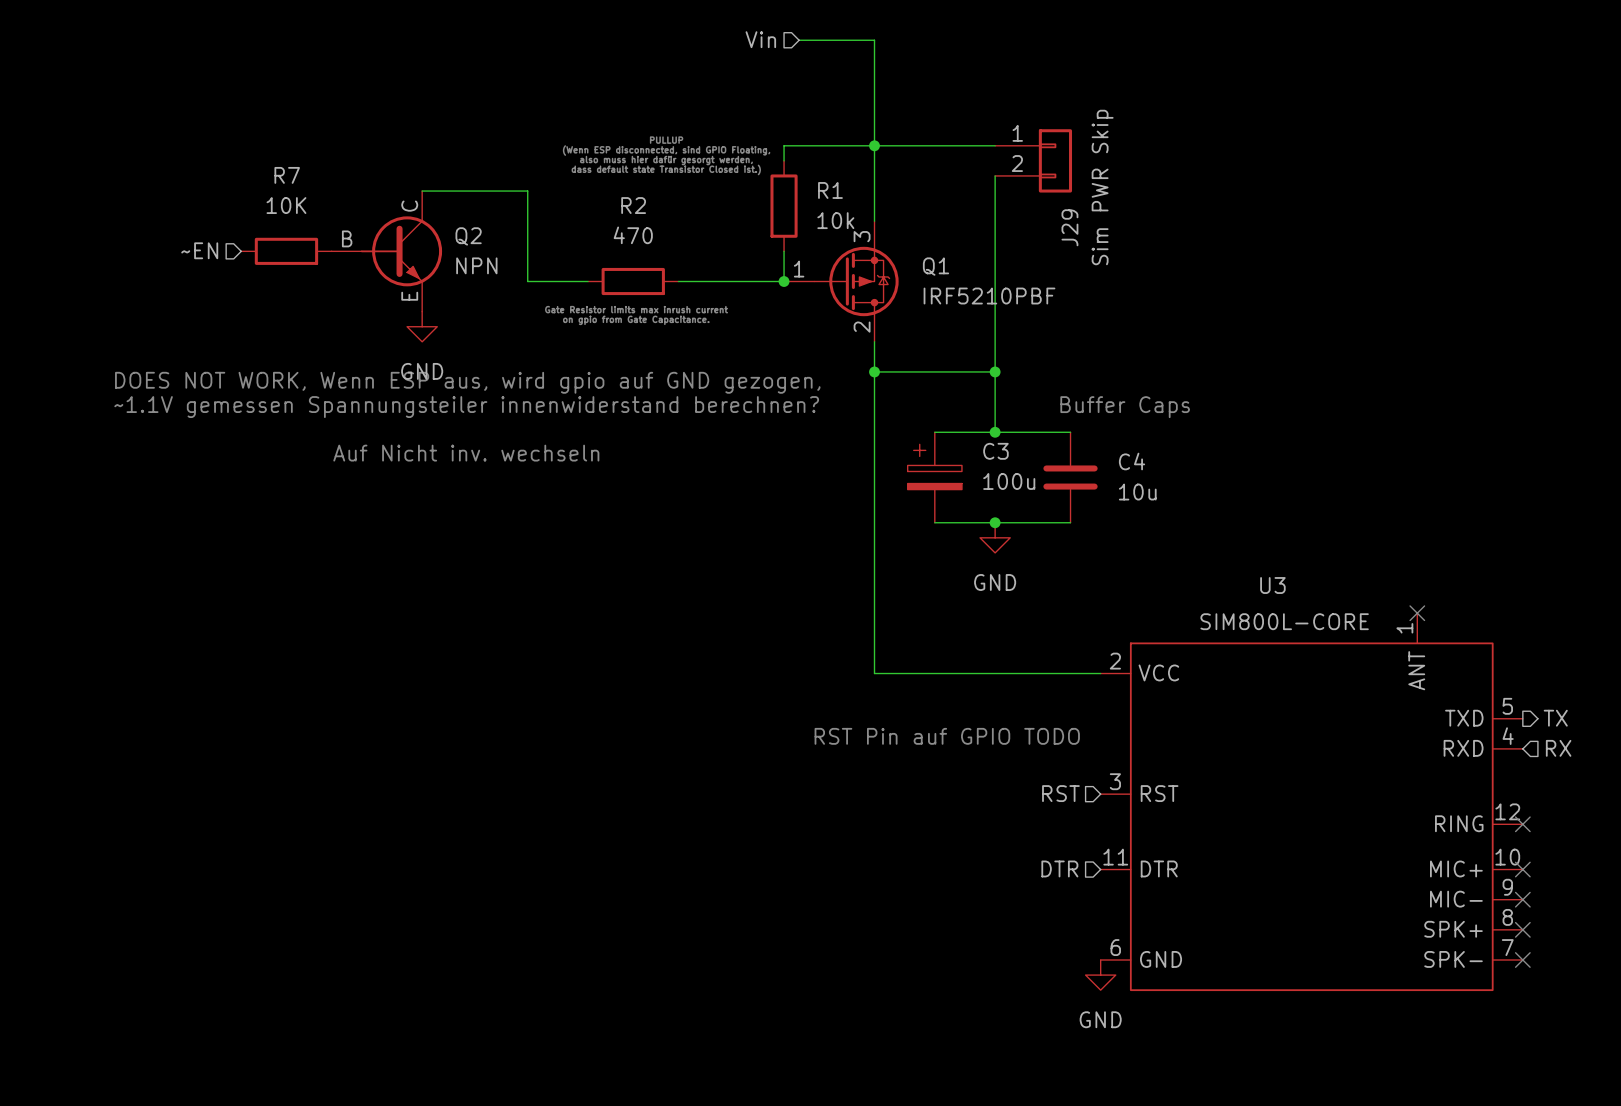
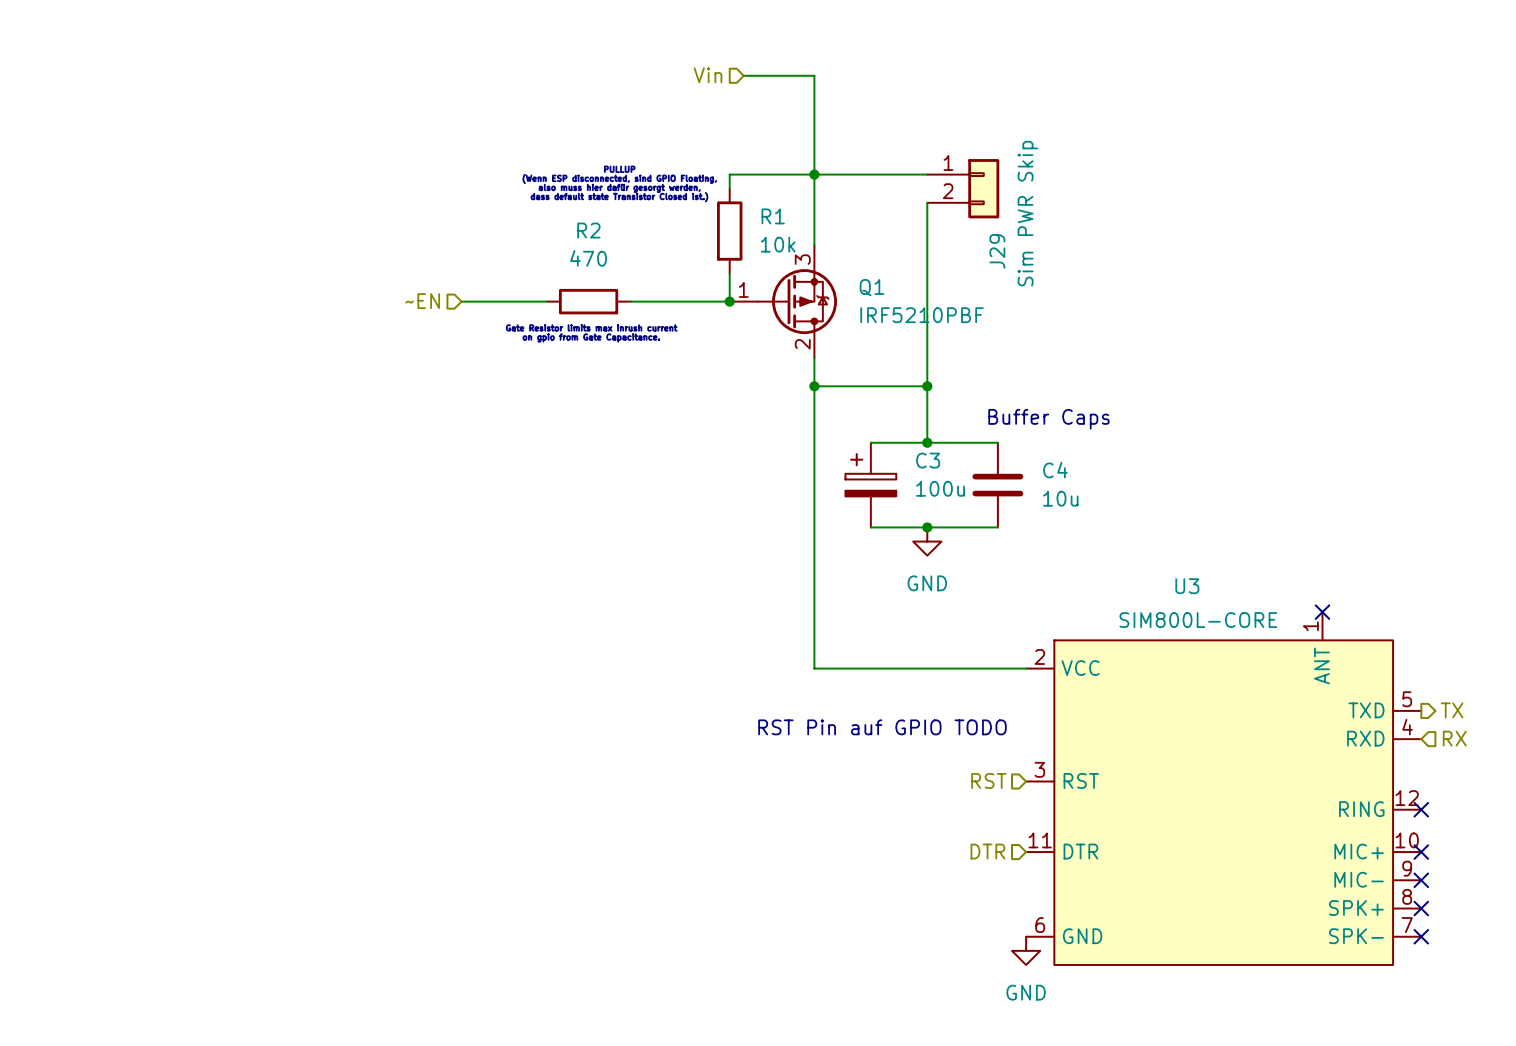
wire: (422, 191) (527, 191) (527, 281) -> (461, 301) (489, 301)
hierarchical label position: ~EN (199, 250) -> ~EN (422, 301)
R7: 10K (286, 251) -> none
Q2: NPN (386, 251) -> none
power symbol: GND (422, 326) -> none
text: DOES NOT WORK, Wenn ESP aus, wird gpio auf GND gezogen, (467, 382) -> none
text: ~1.1V gemessen Spannungsteiler innenwiderstand berechnen? (466, 407) -> none
text: Auf Nicht inv. wechseln (466, 453) -> none

